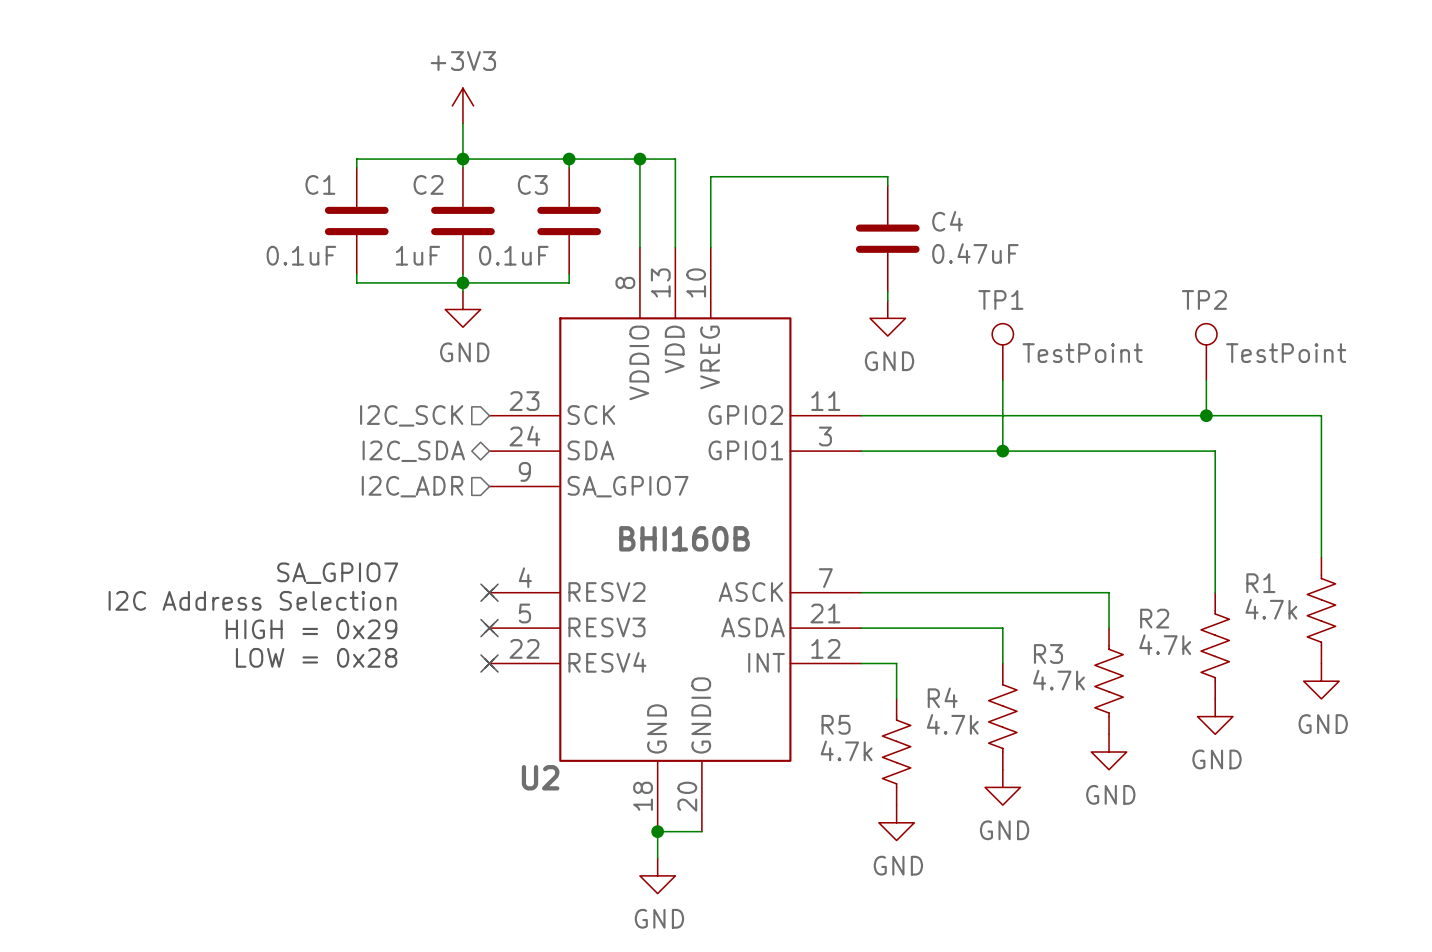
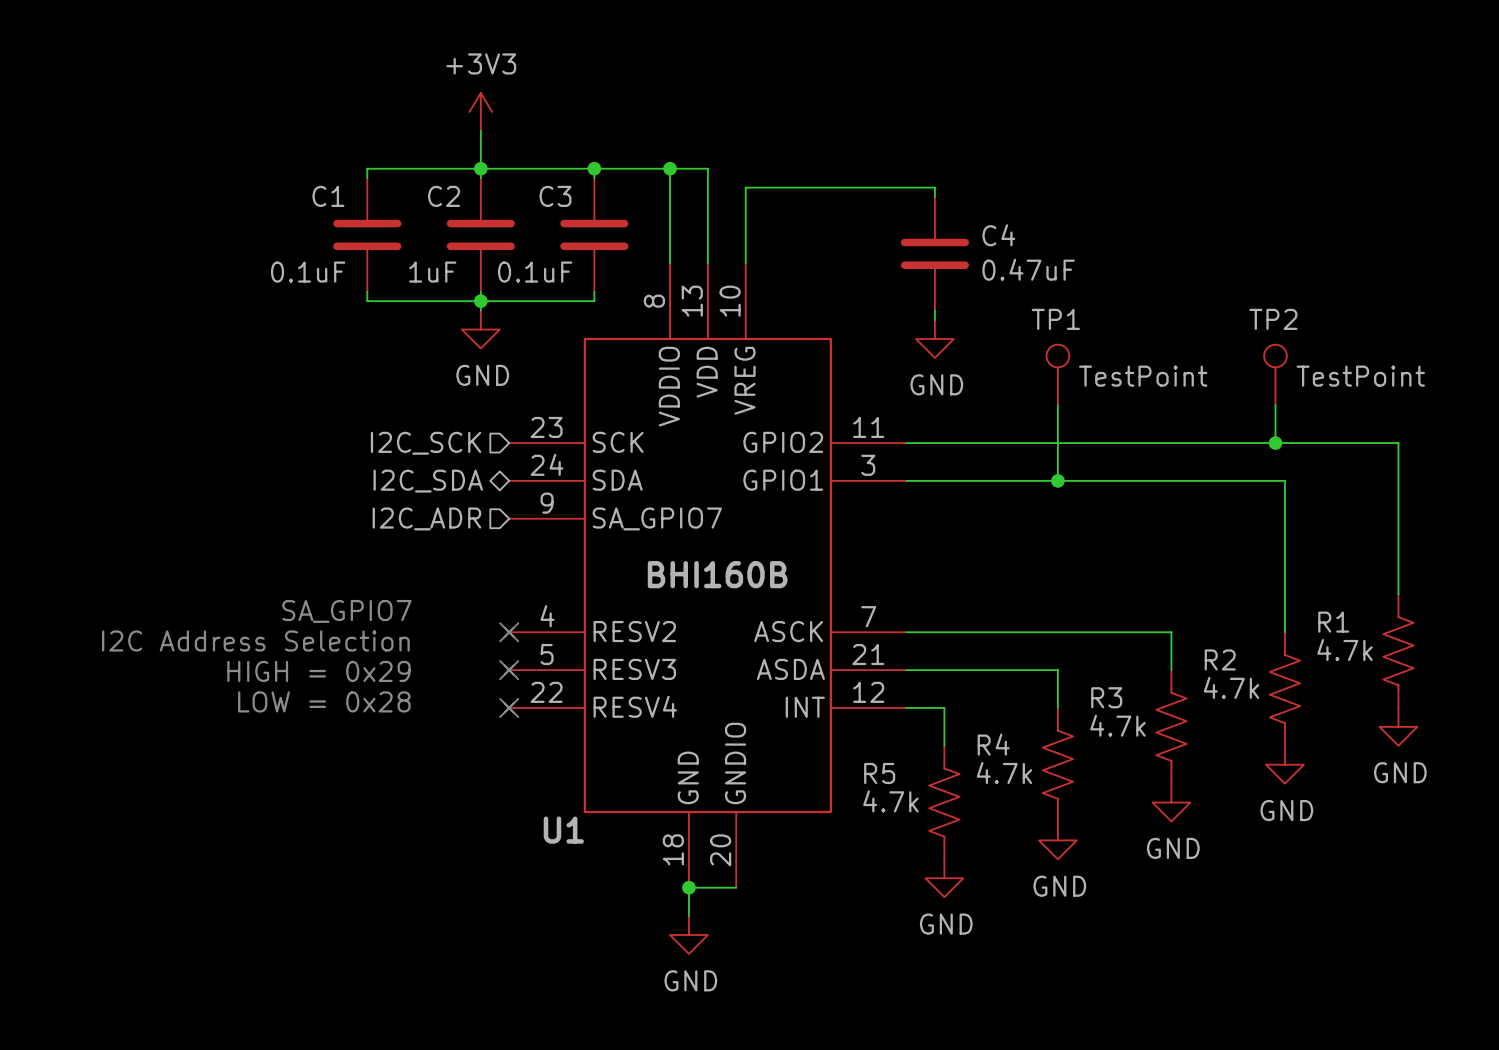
U2 name: U2 (540, 777) -> U1 (563, 830)

